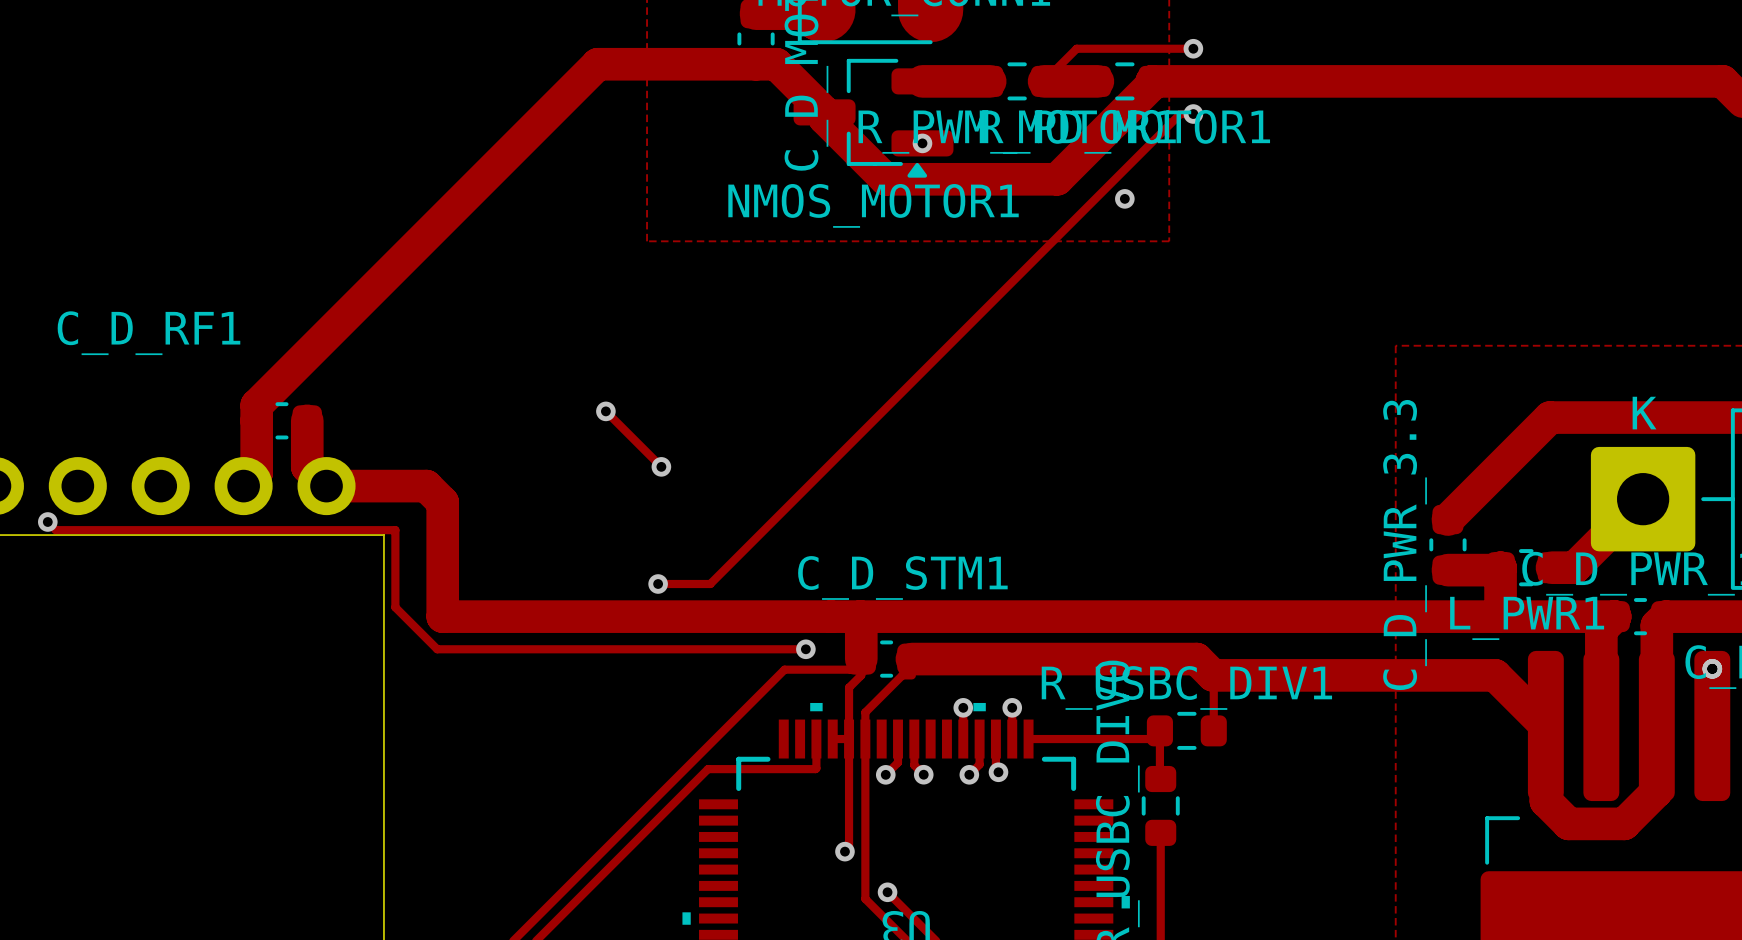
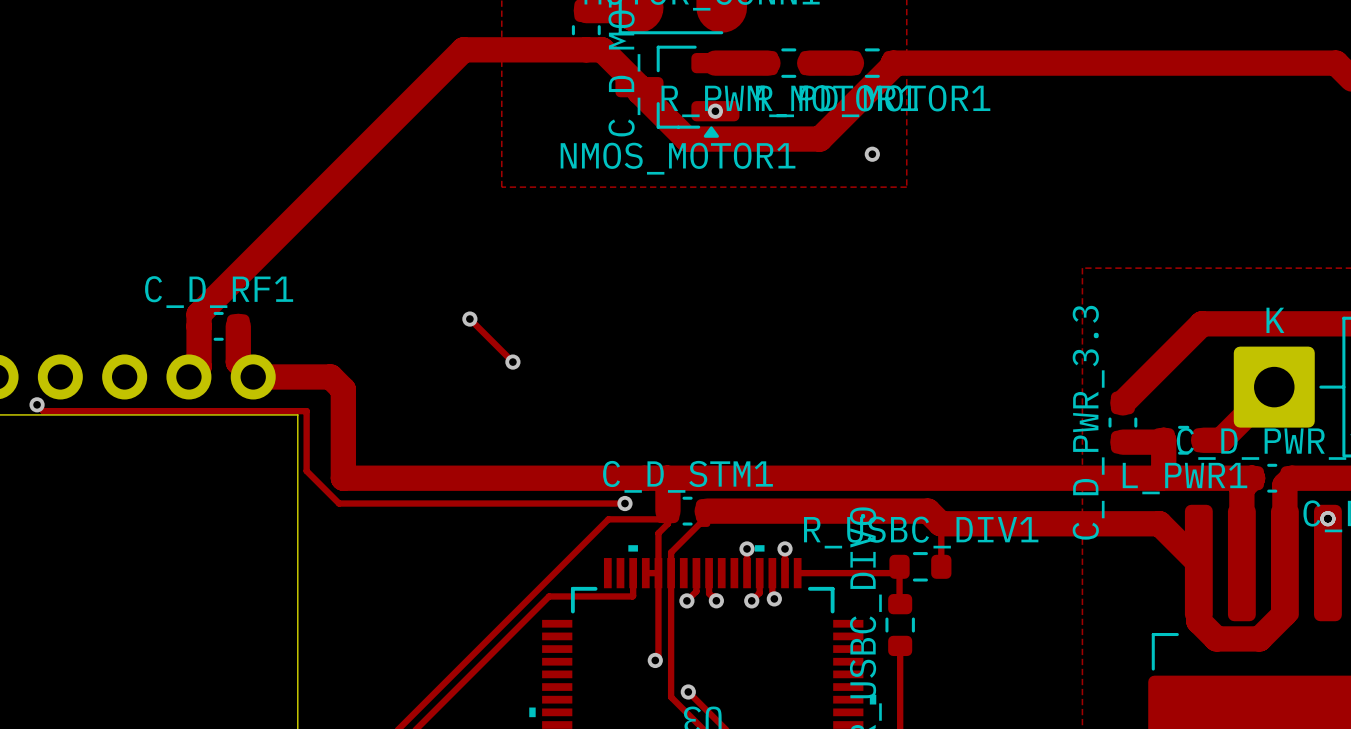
track: (1193, 48) (1076, 48) (1044, 81) -> none
via: (1193, 48) -> none
track: (1193, 114) (1180, 114) (710, 584) (658, 584) -> none
via: (1193, 114) -> none
C_D_RF1 name position: C_D_RF1 (148, 333) -> C_D_RF1 (219, 292)
C_D_STM1 name position: C_D_STM1 (902, 577) -> C_D_STM1 (687, 476)
via: (658, 584) -> none

